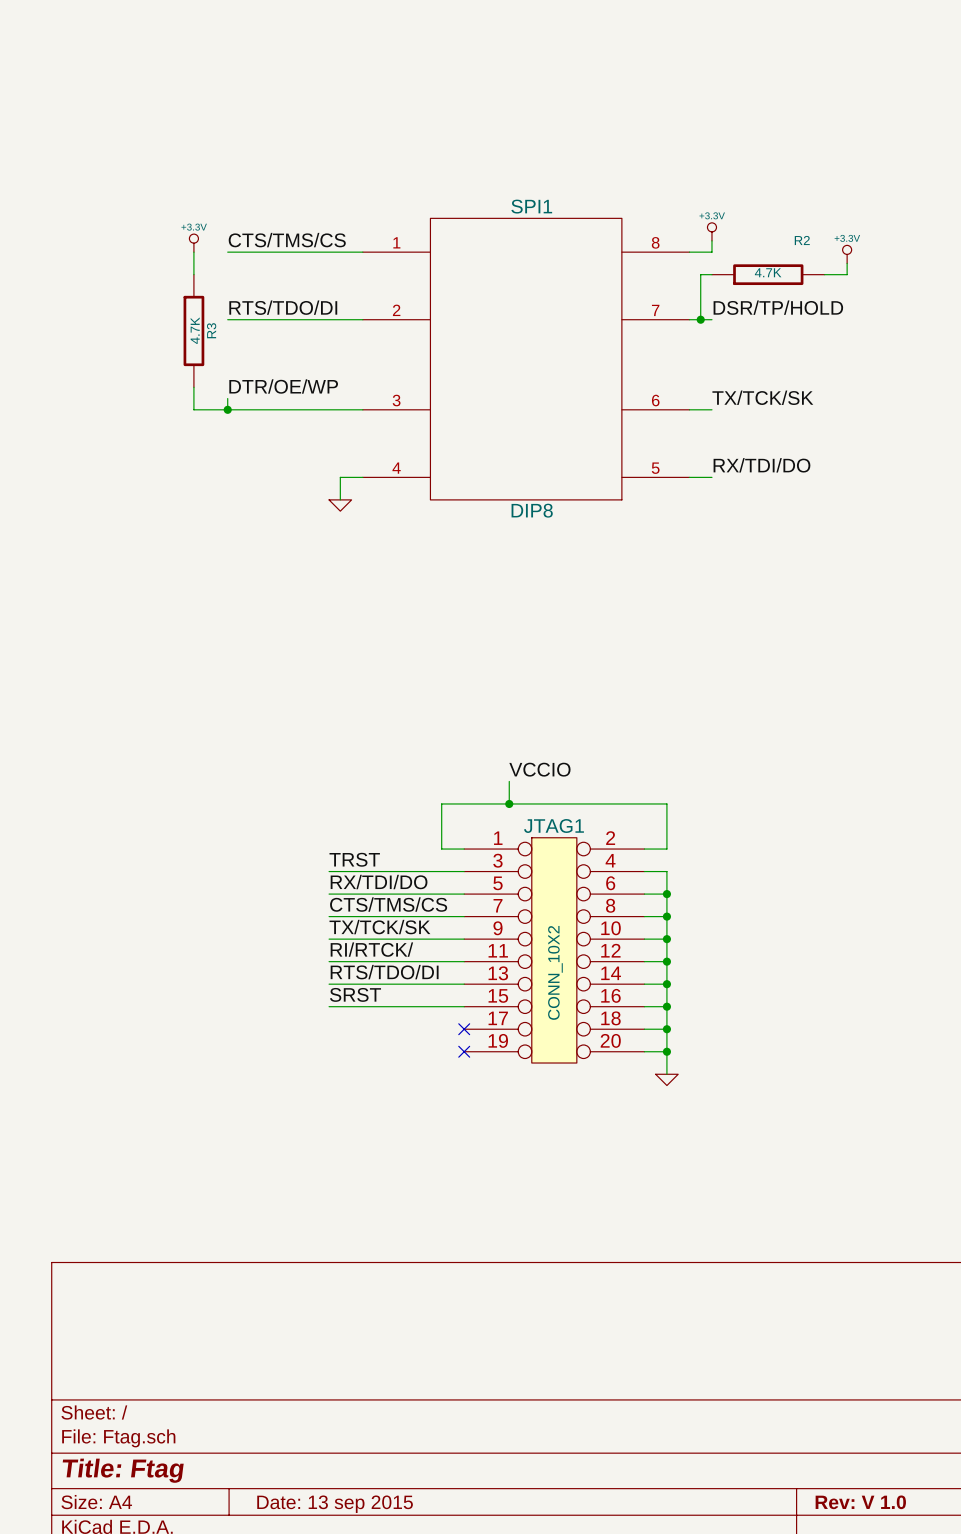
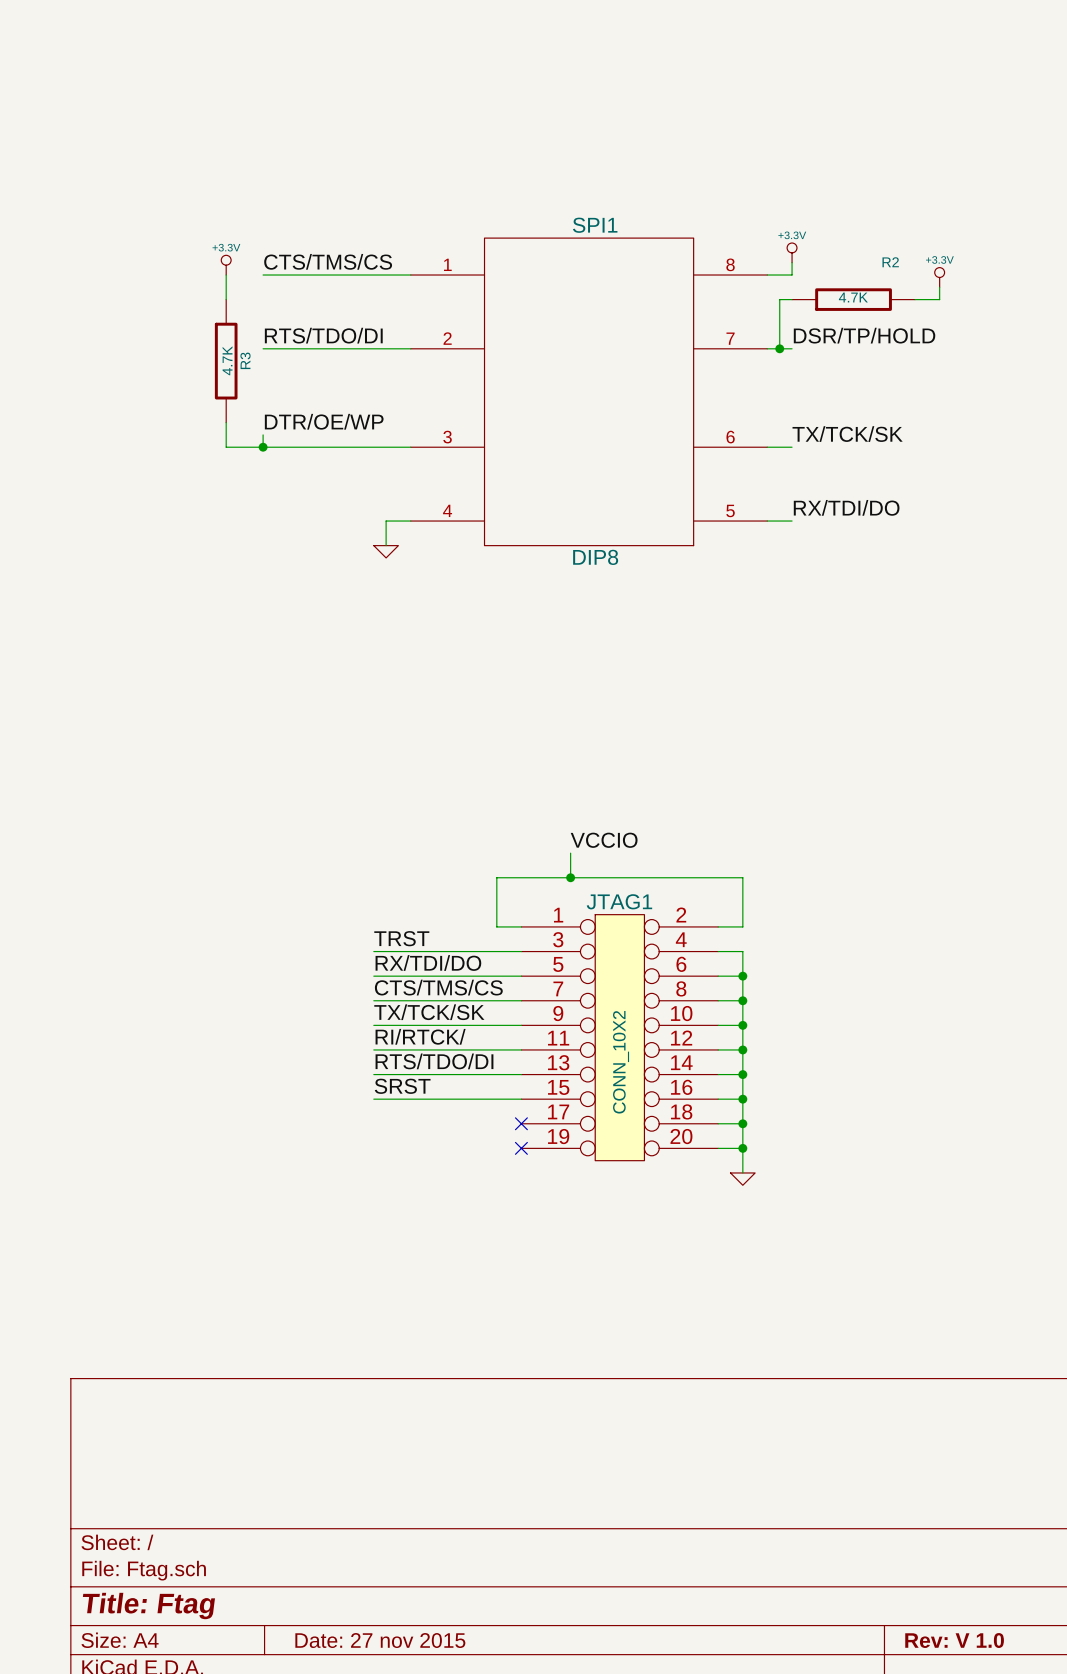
title block: Date: 13 sep 2015 (335, 1504) -> Date: 27 nov 2015 (380, 1640)

